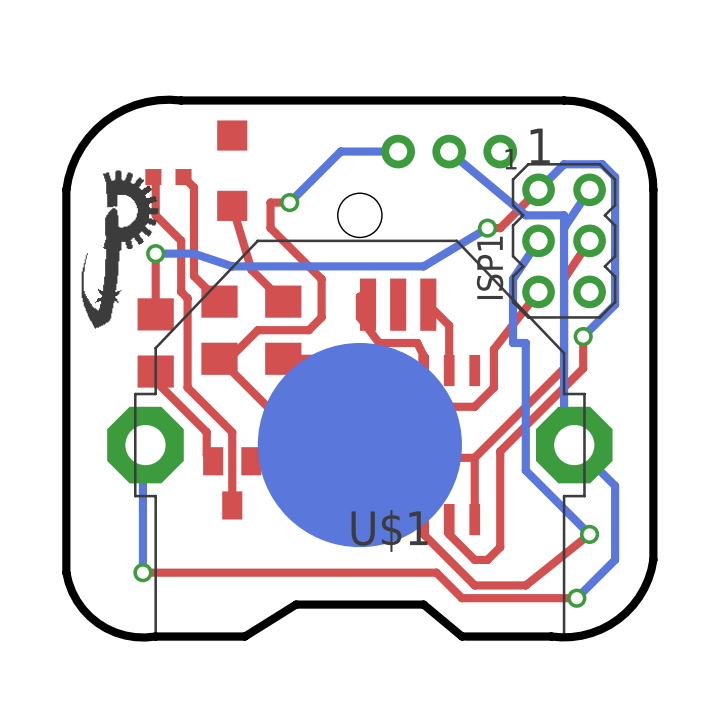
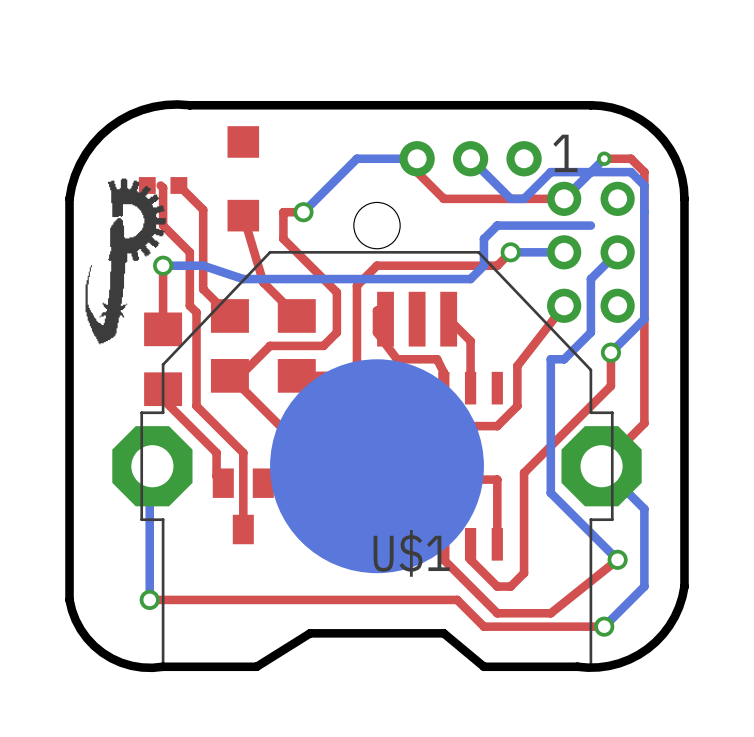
bottom track: (449, 151) (525, 215) -> (470, 158) (510, 198) (524, 198) (550, 172) (590, 172) (604, 158)
top track: none -> (604, 158) (631, 158) (644, 172) (644, 423) (601, 466)
via: none -> (604, 158)
part position: (168, 177) -> (163, 185)
top track: (183, 177) (193, 187) (193, 200) -> (178, 185) (203, 209)
top track: (538, 189) (500, 228) (487, 228) -> (564, 198) (443, 198) (417, 172) (417, 158)
bottom track: (589, 189) (564, 228) -> none
bottom track: (564, 215) (564, 266) -> (617, 252) (590, 279)
bottom track: (487, 228) (423, 266) -> (550, 225) (497, 225) (483, 238) (483, 265) (470, 279) (443, 279)
via position: (487, 228) -> (510, 252)
top track: none -> (510, 252) (497, 265) (376, 265) (356, 285) (356, 372) (353, 375)
bottom track: (538, 240) (513, 279) (513, 342) (525, 342) -> (590, 332) (564, 359) (550, 359)
bottom track: none -> (564, 252) (510, 252)
ISP1 side: bottom (564, 240) -> top (590, 252)
top track: (589, 240) (564, 279) (564, 368) (474, 457) -> none
bottom track: (564, 317) (564, 445) (574, 445) -> none

